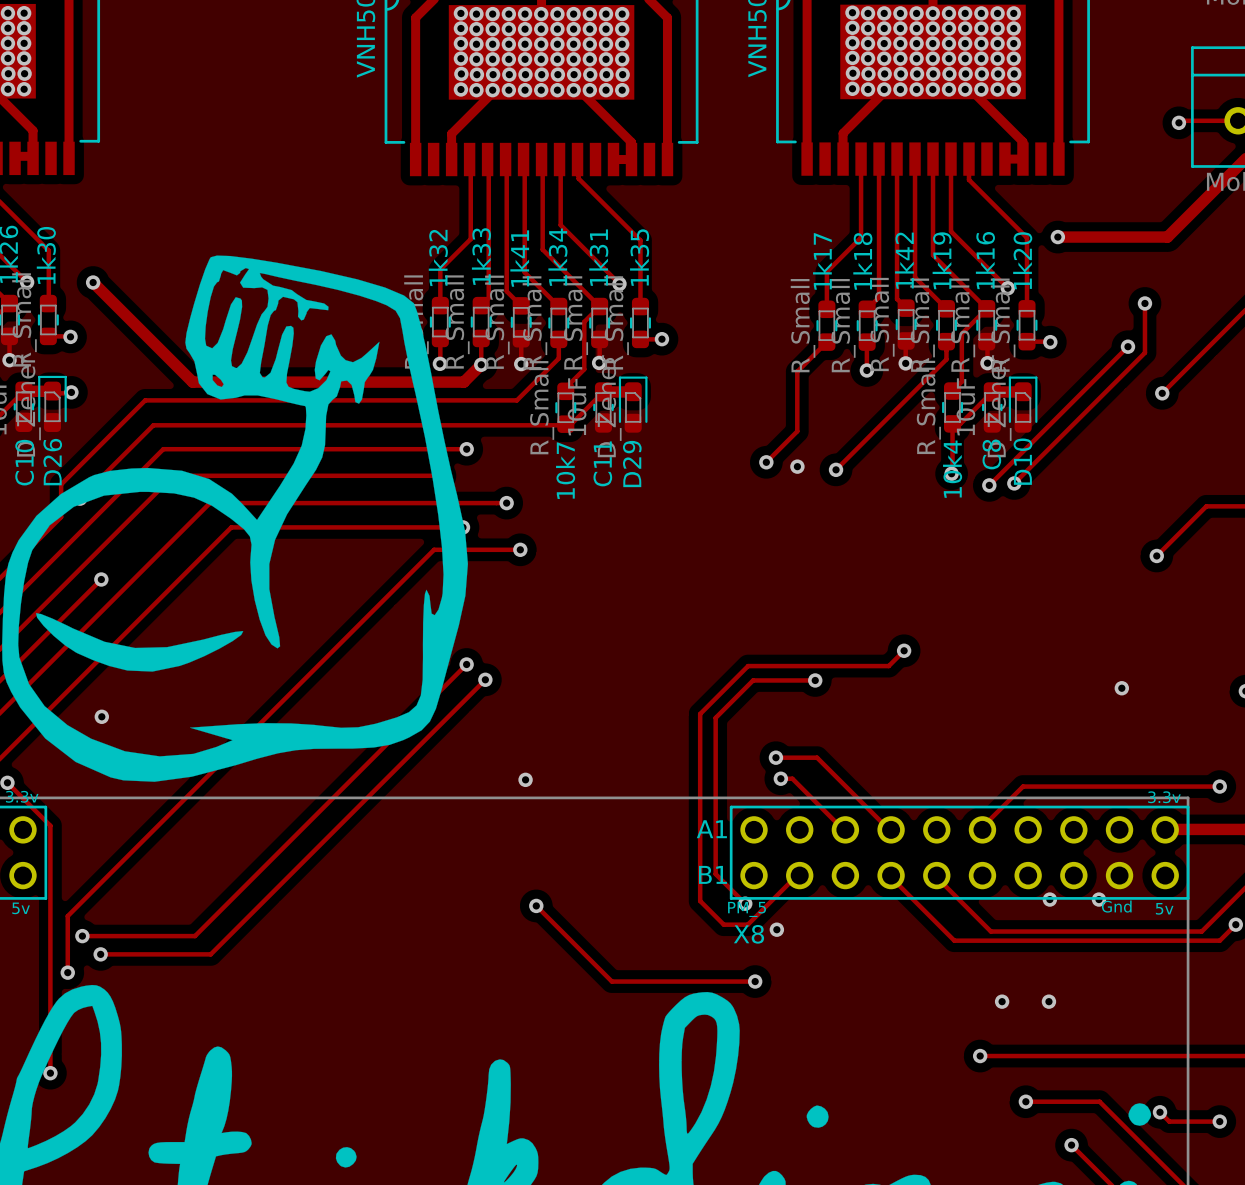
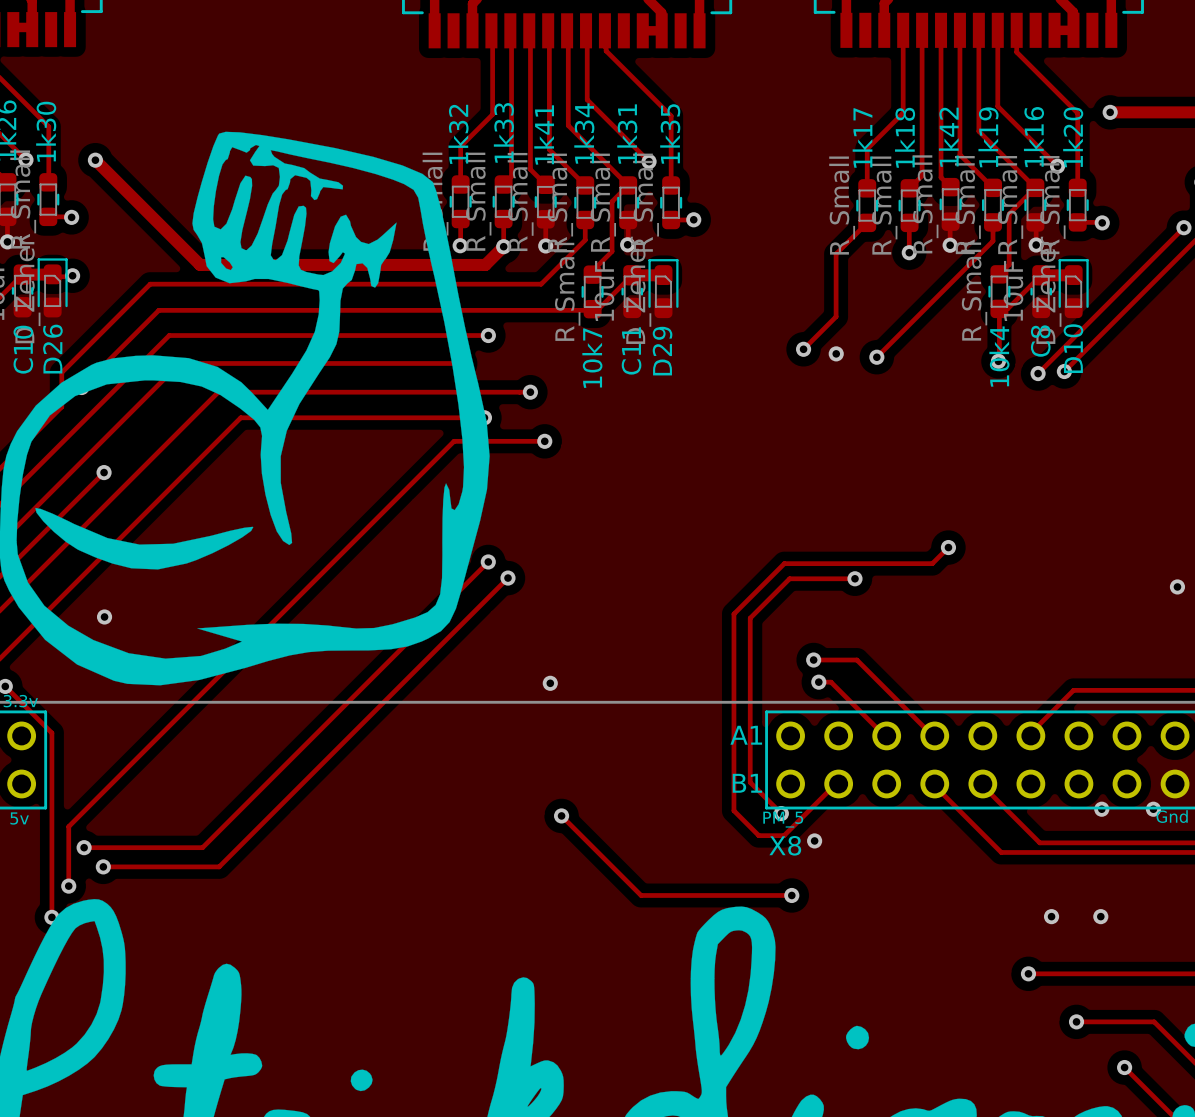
track: (50, 825) (50, 1073) -> (50, 731) (51, 917)
via position: (50, 1073) -> (51, 917)

